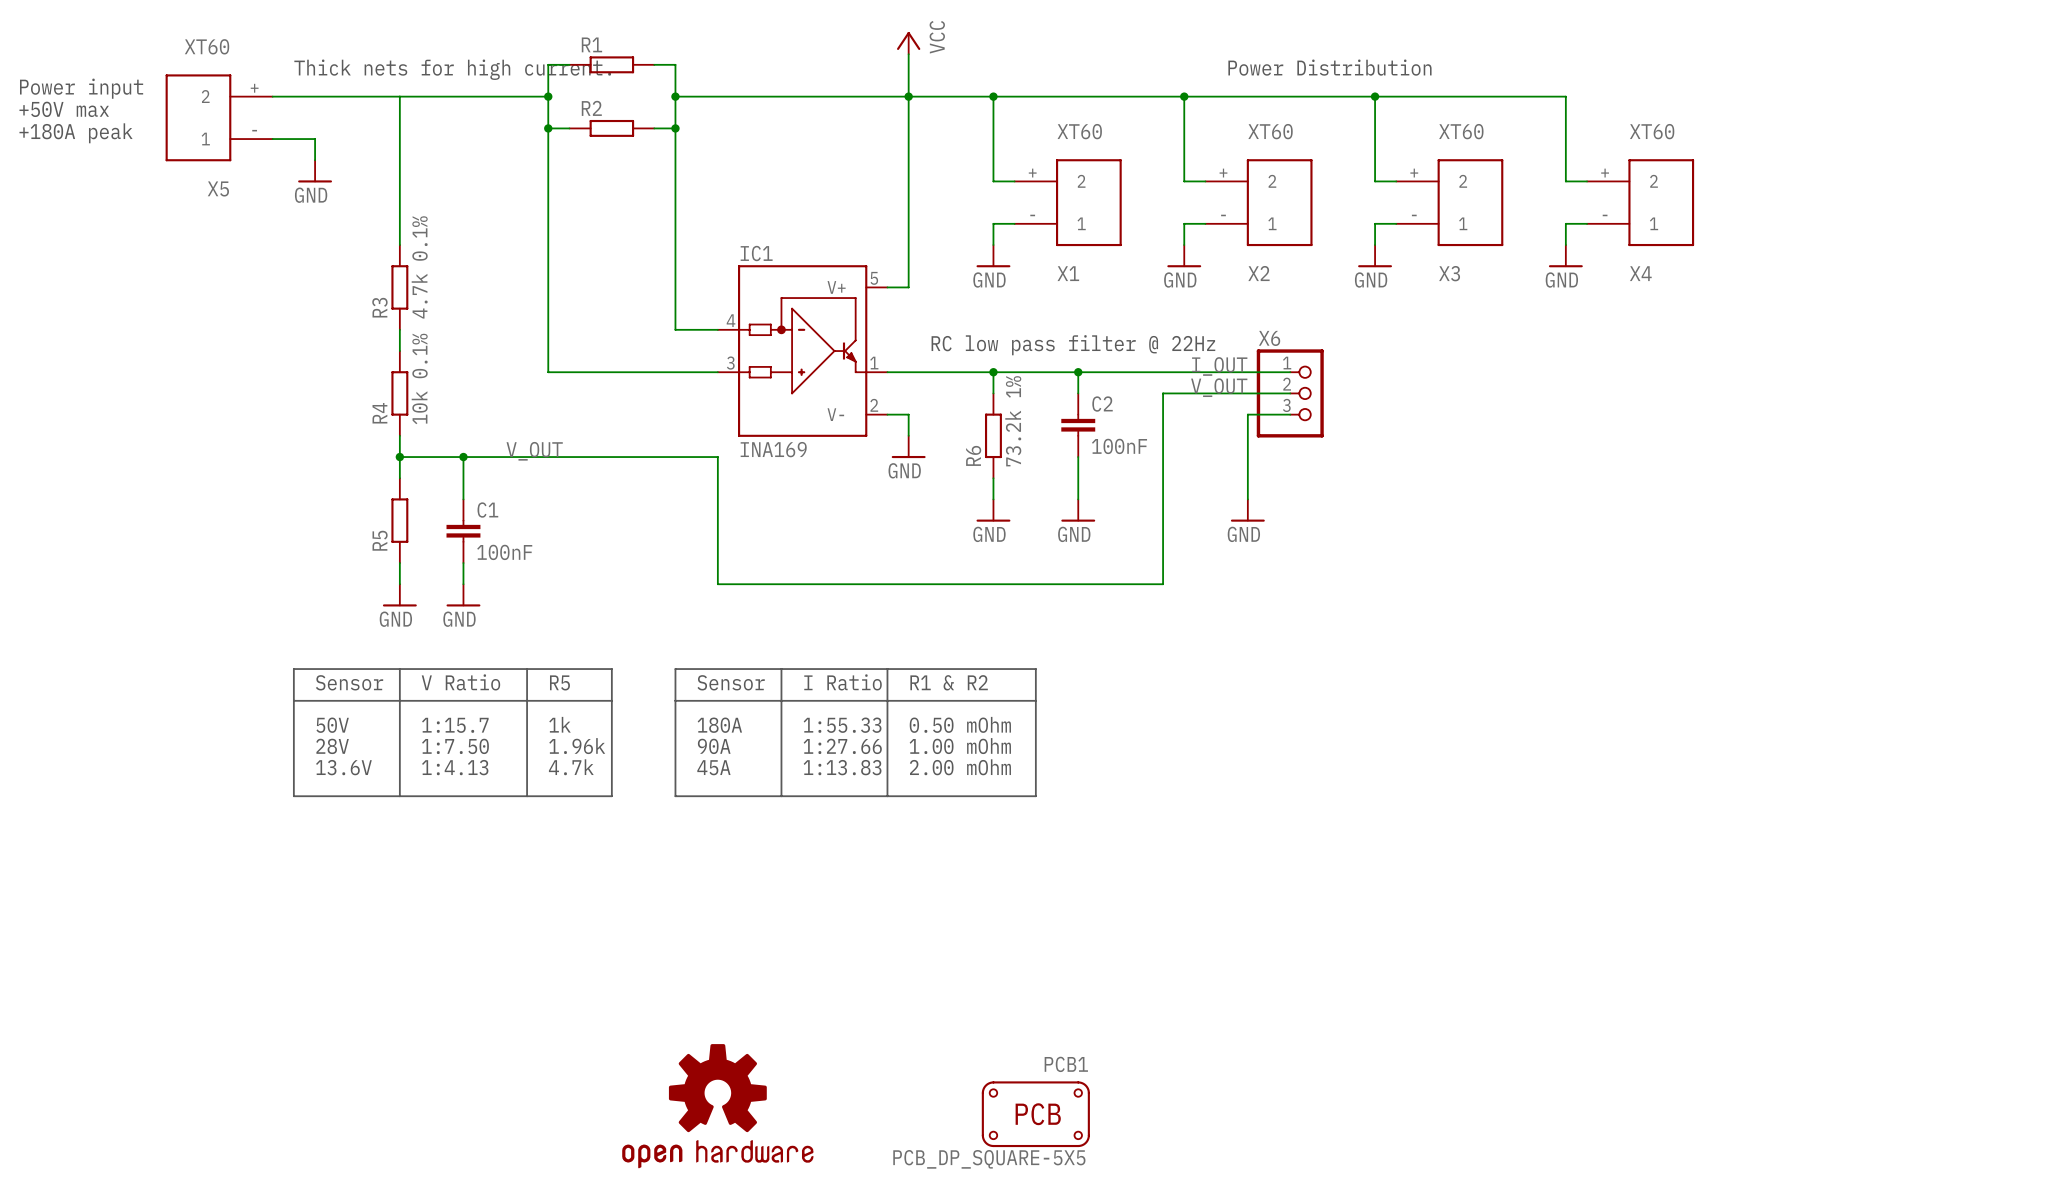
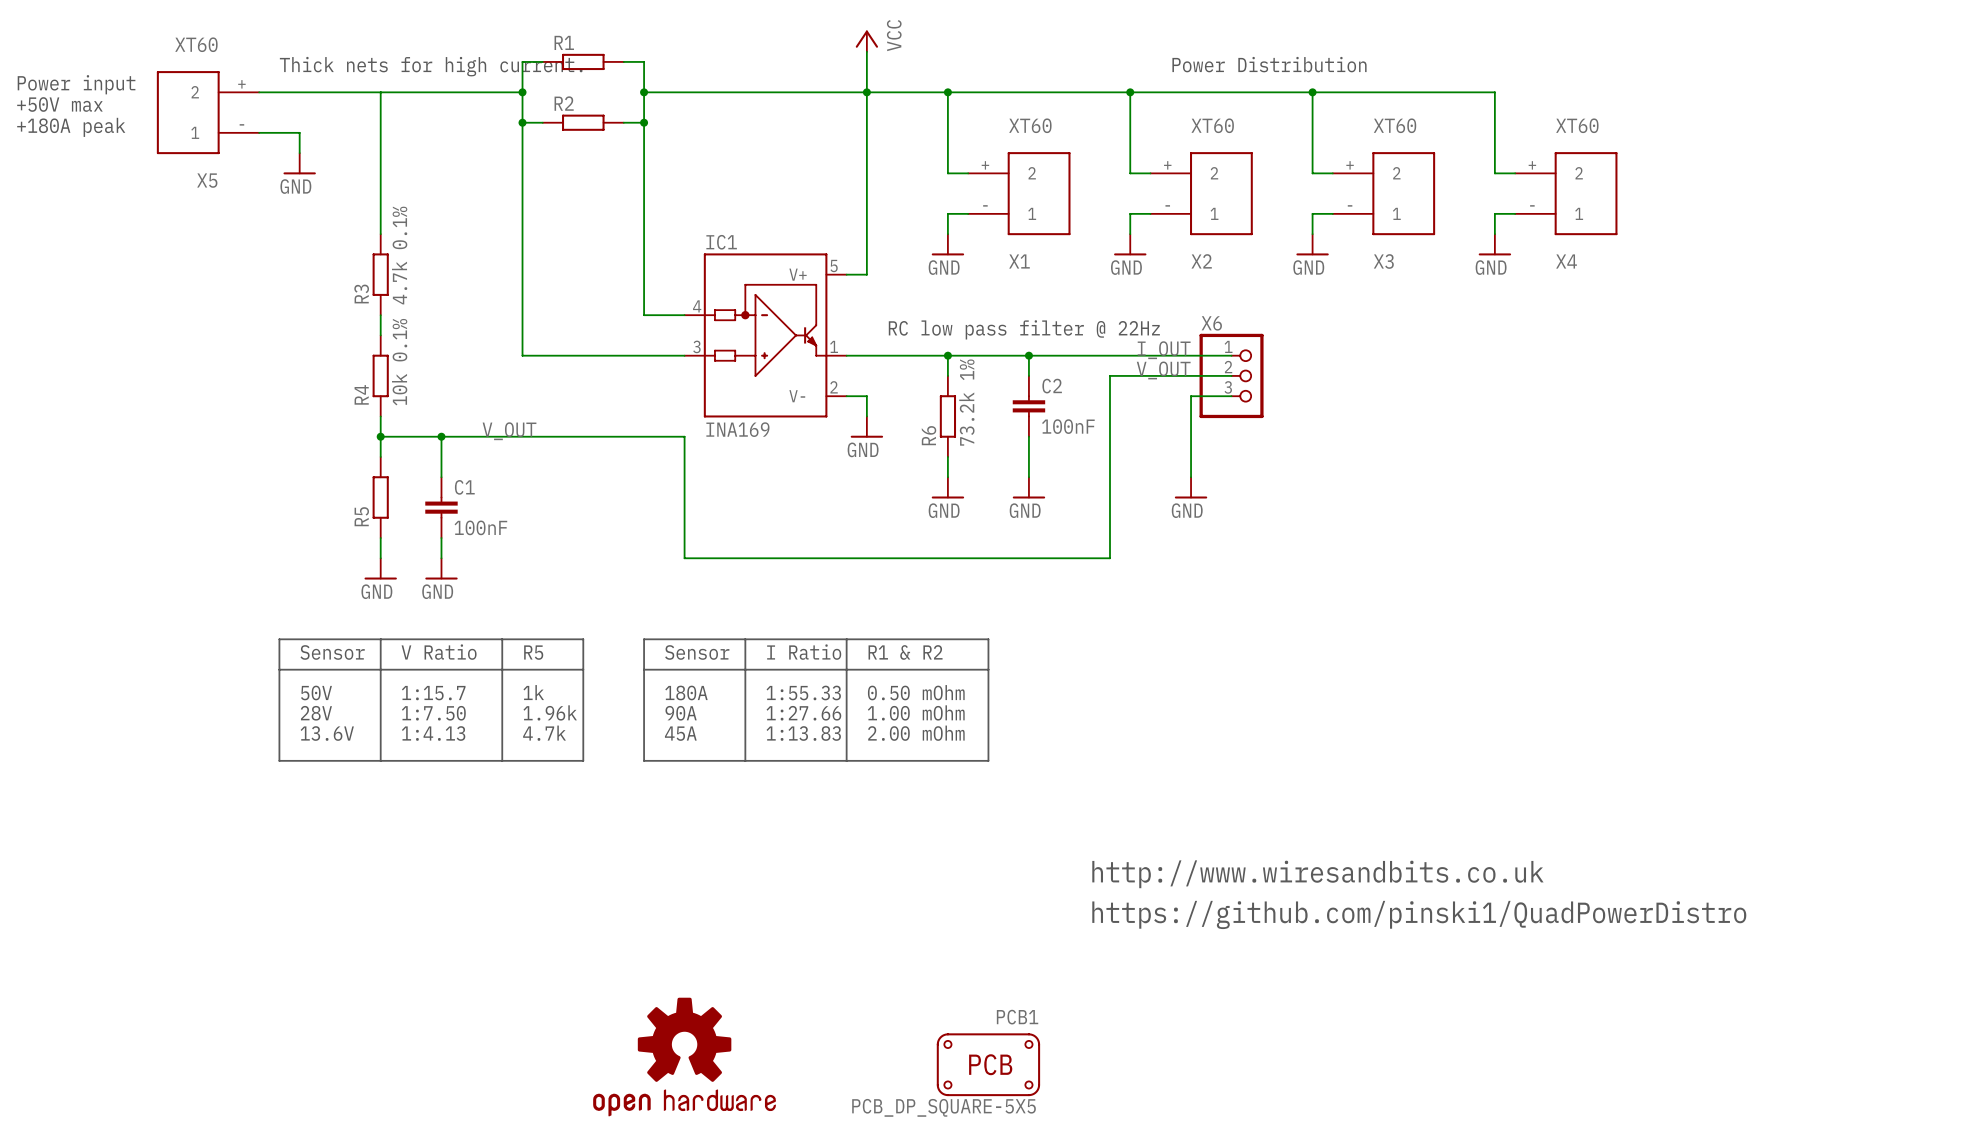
text: none -> http://www.wiresandbits.co.uk (1317, 874)
text: none -> https://github.com/pinski1/QuadPowerDistro (1419, 914)

